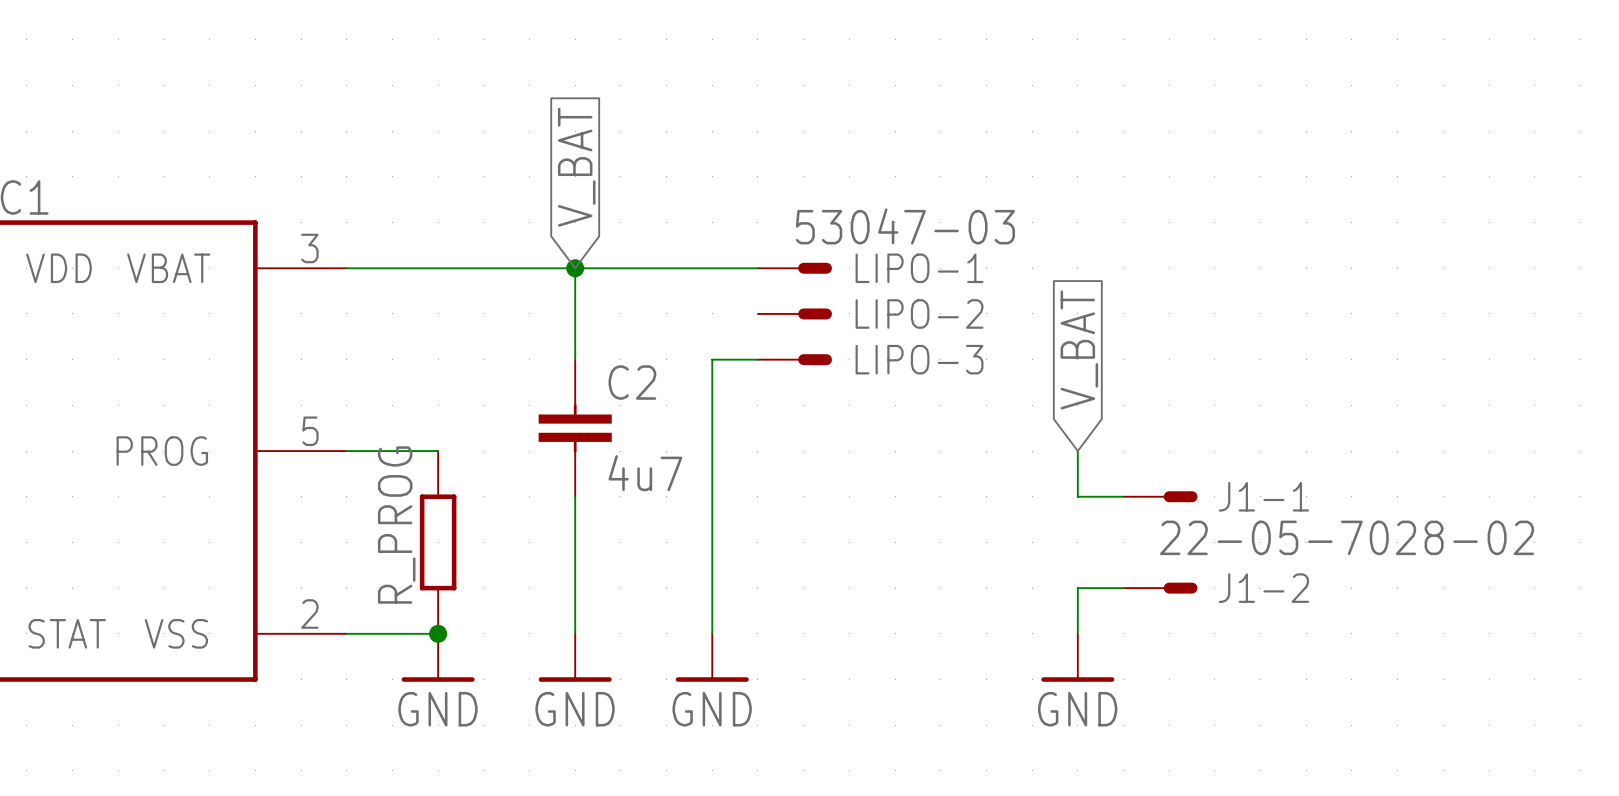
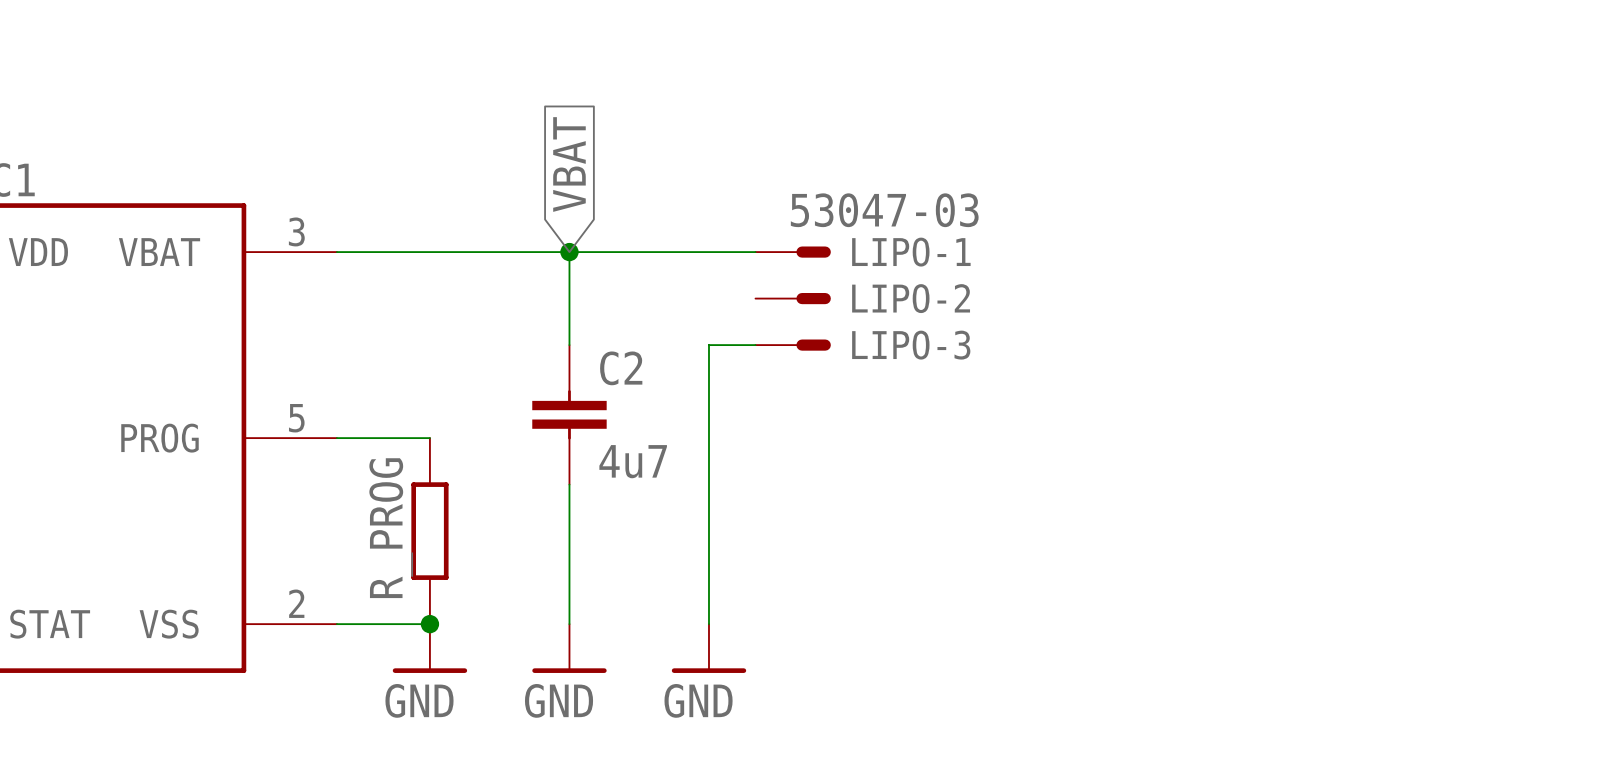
global label: V_BAT (576, 167) -> VBAT (569, 164)
global label: V_BAT (1079, 349) -> none
wire: (1077, 451) (1077, 496) (1123, 496) -> none
J1-1: 22-05-7028-02 (1160, 496) -> none
wire: (1123, 588) (1077, 588) (1077, 633) -> none
J1-2: (1160, 588) -> none
power symbol: GND (1077, 657) -> none

